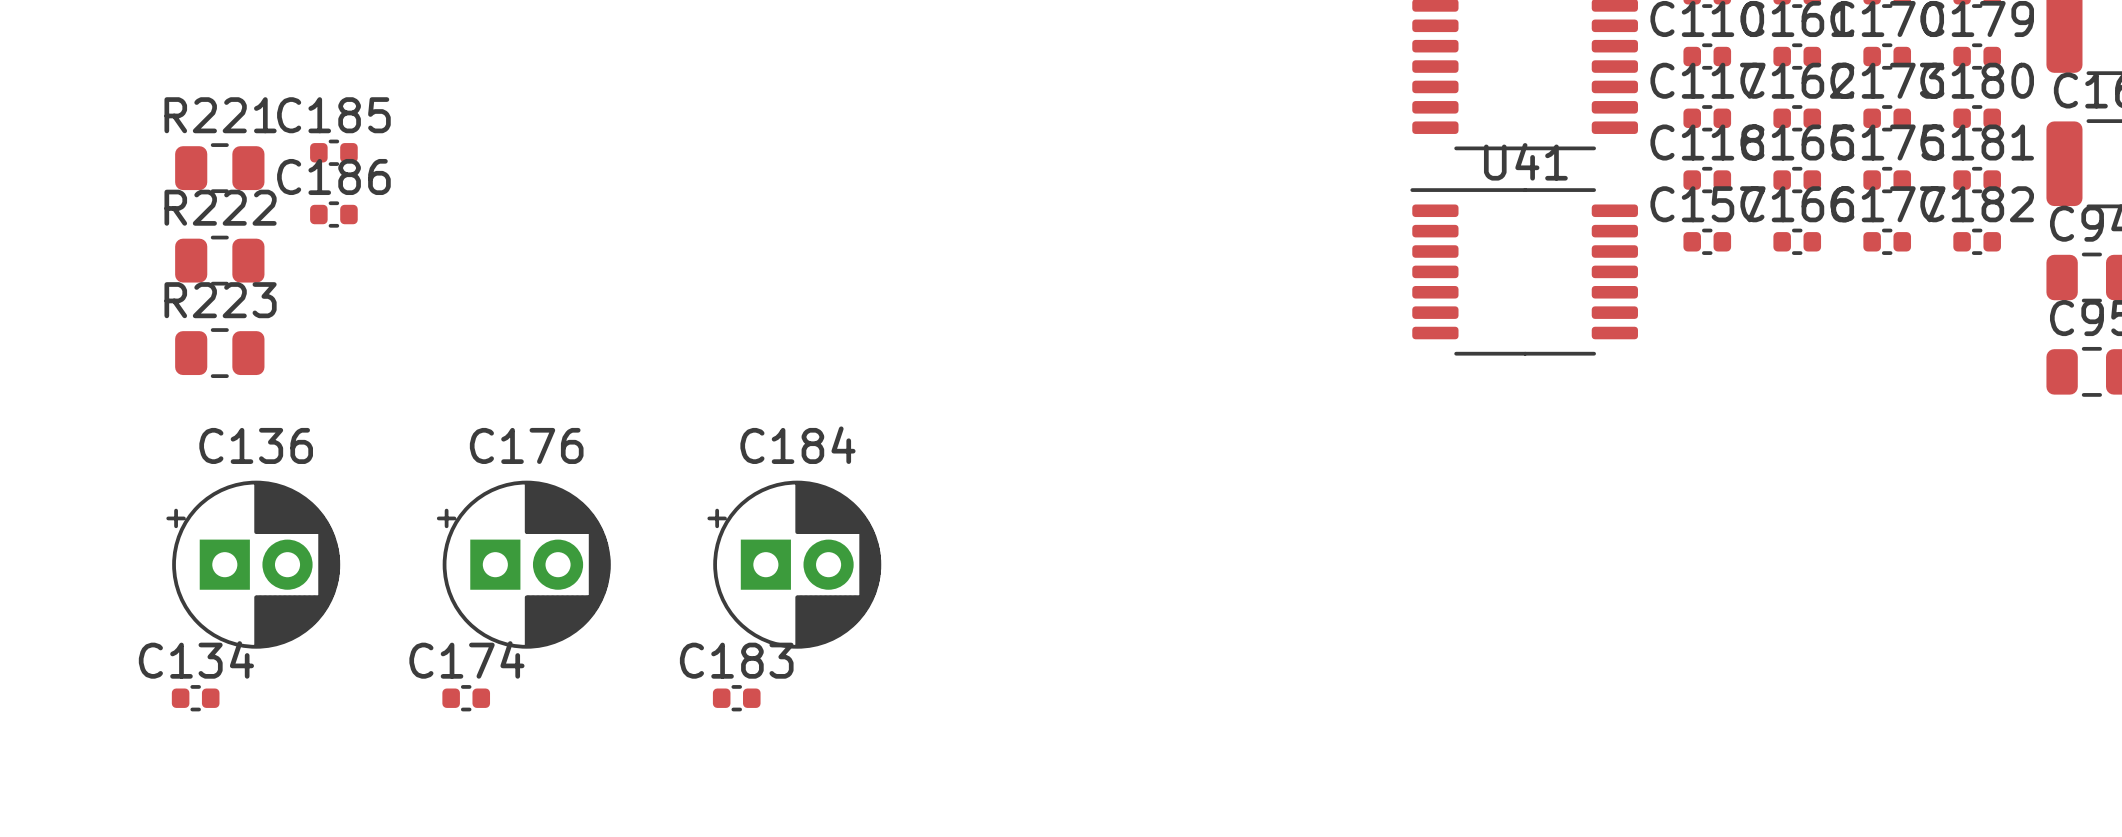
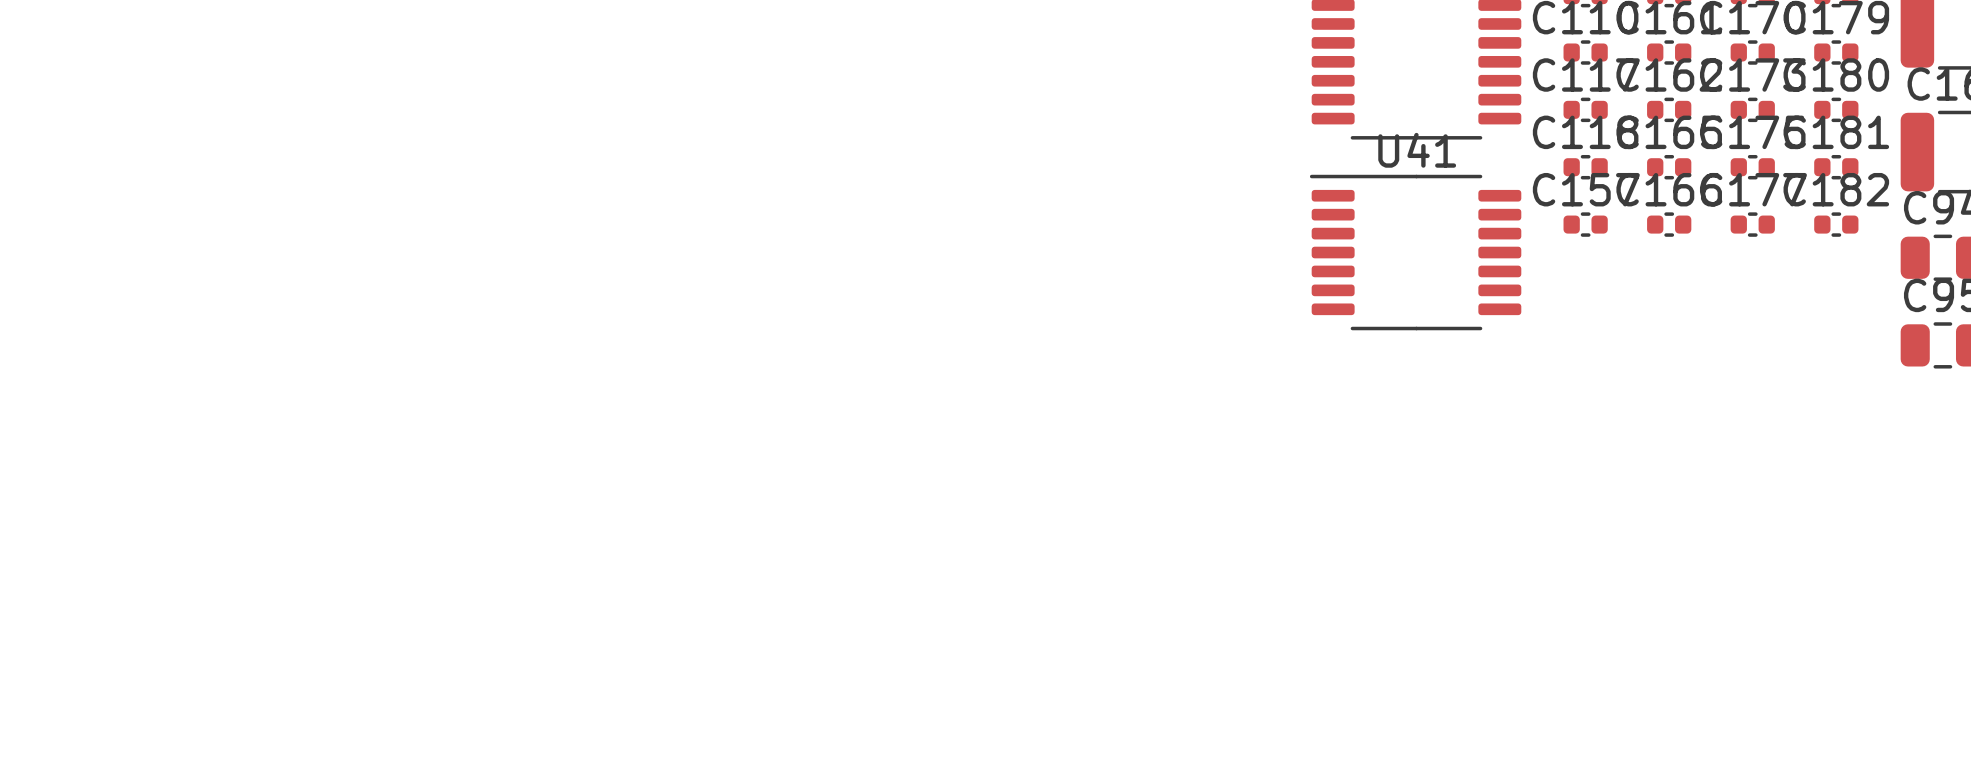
C185: (333, 152) -> none
R221: (219, 168) -> none
C186: (333, 214) -> none
R222: (219, 260) -> none
R223: (219, 353) -> none
C136: (253, 564) -> none
C176: (523, 564) -> none
C184: (794, 564) -> none
C134: (195, 698) -> none
C174: (466, 698) -> none
C183: (736, 698) -> none

